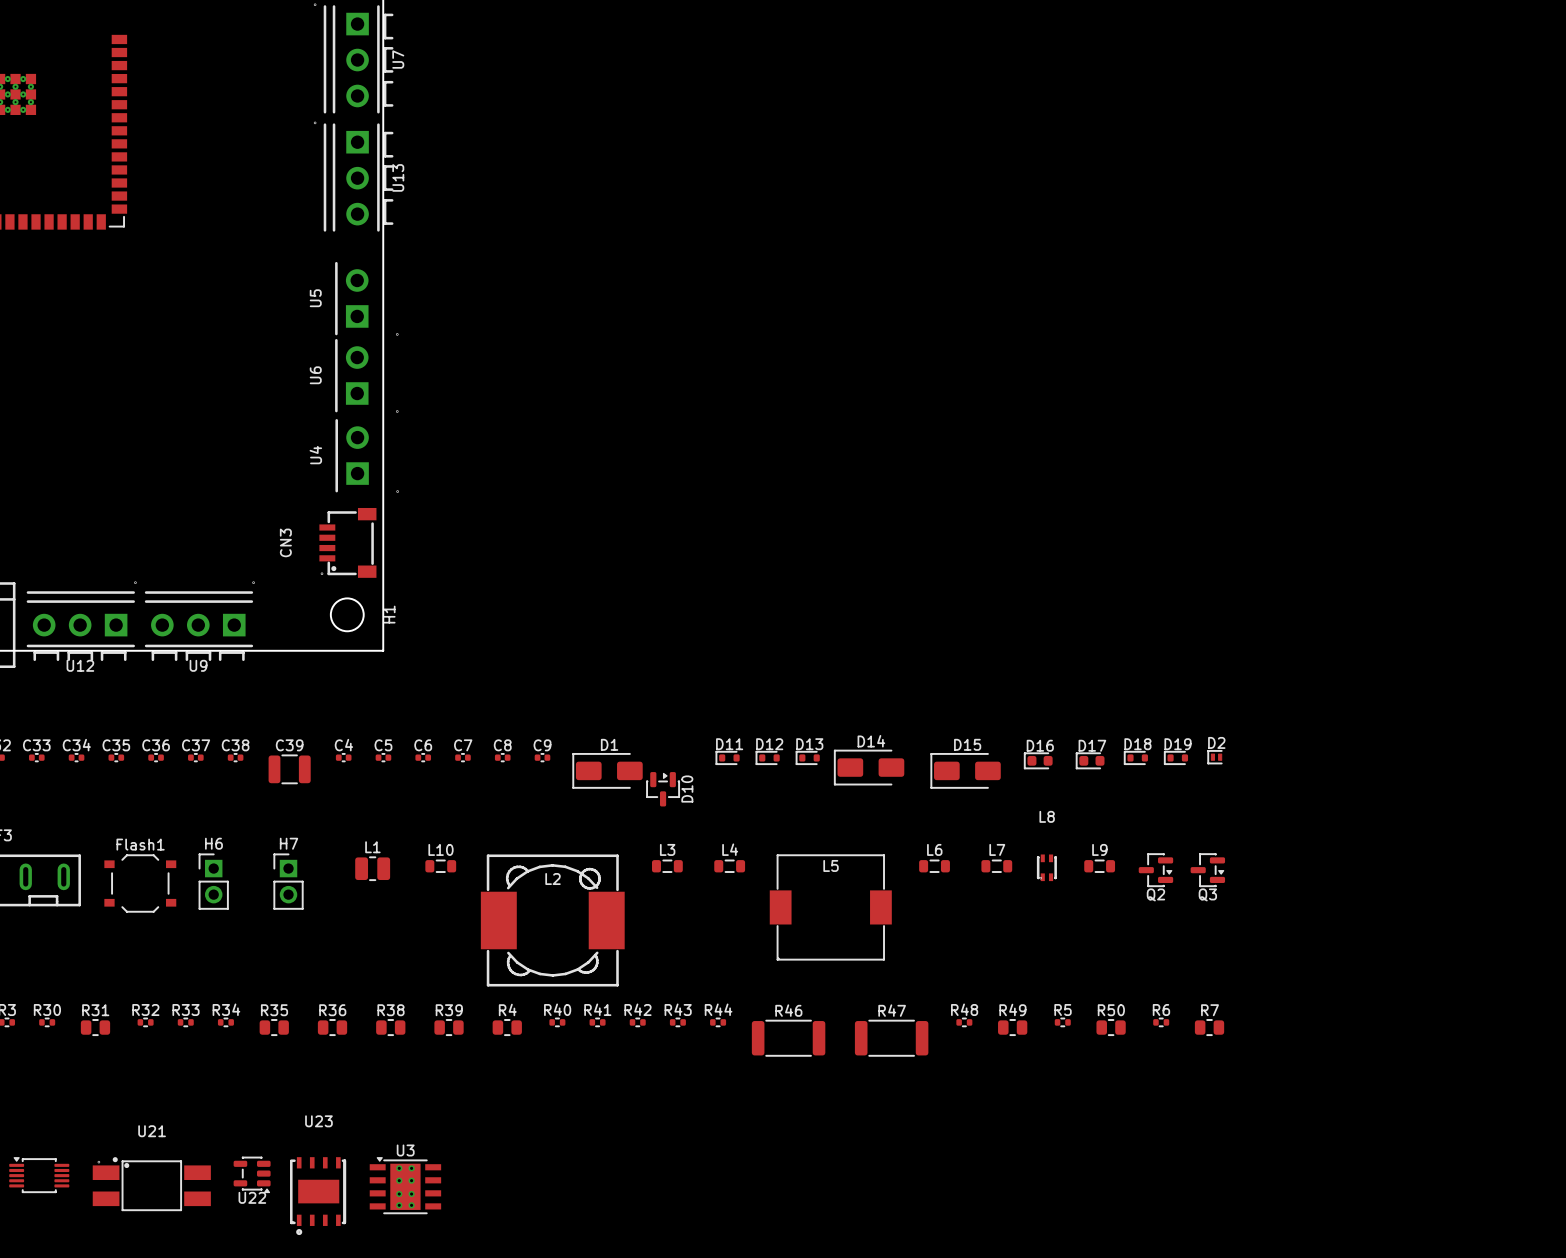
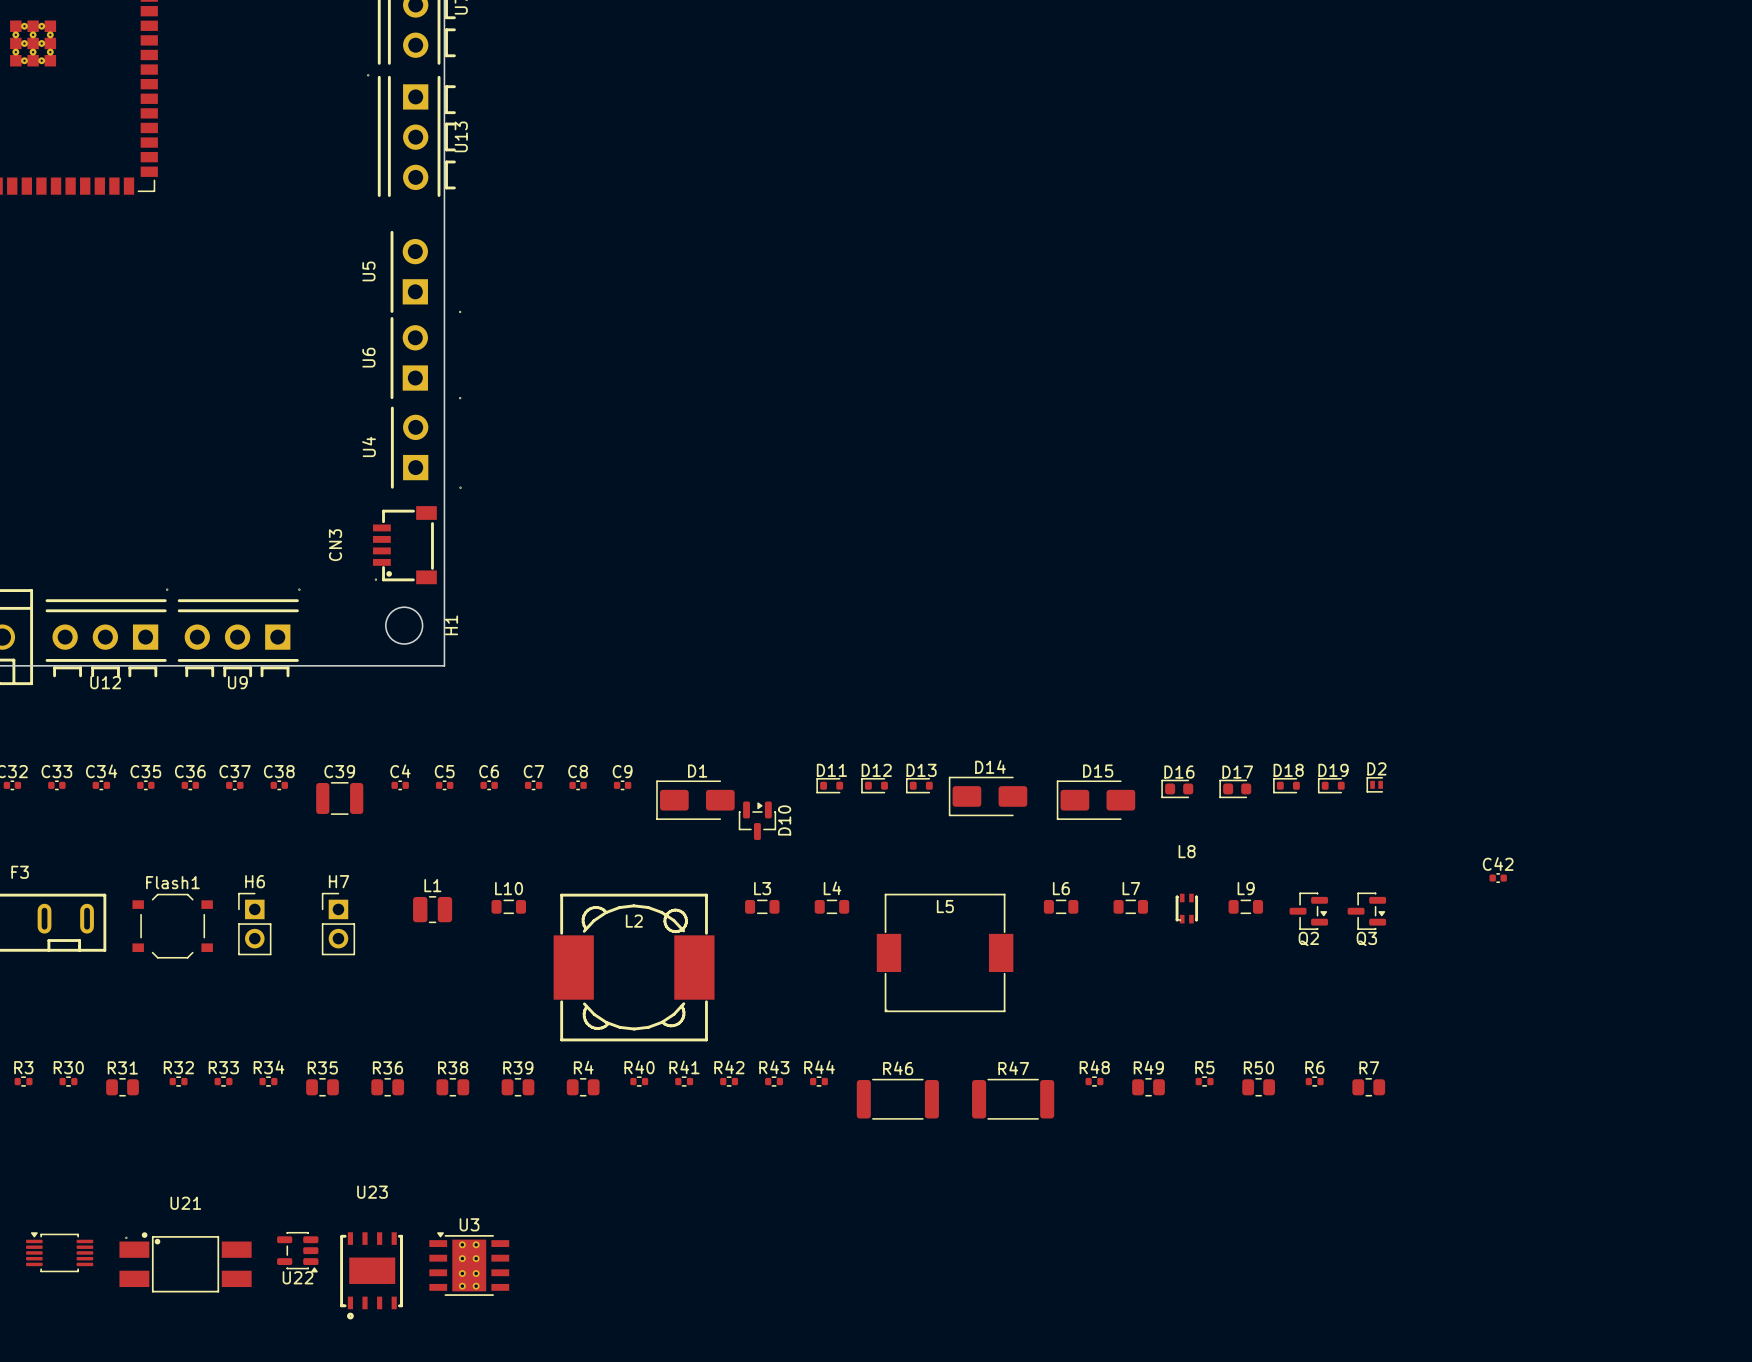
C42: none -> (1498, 878)

